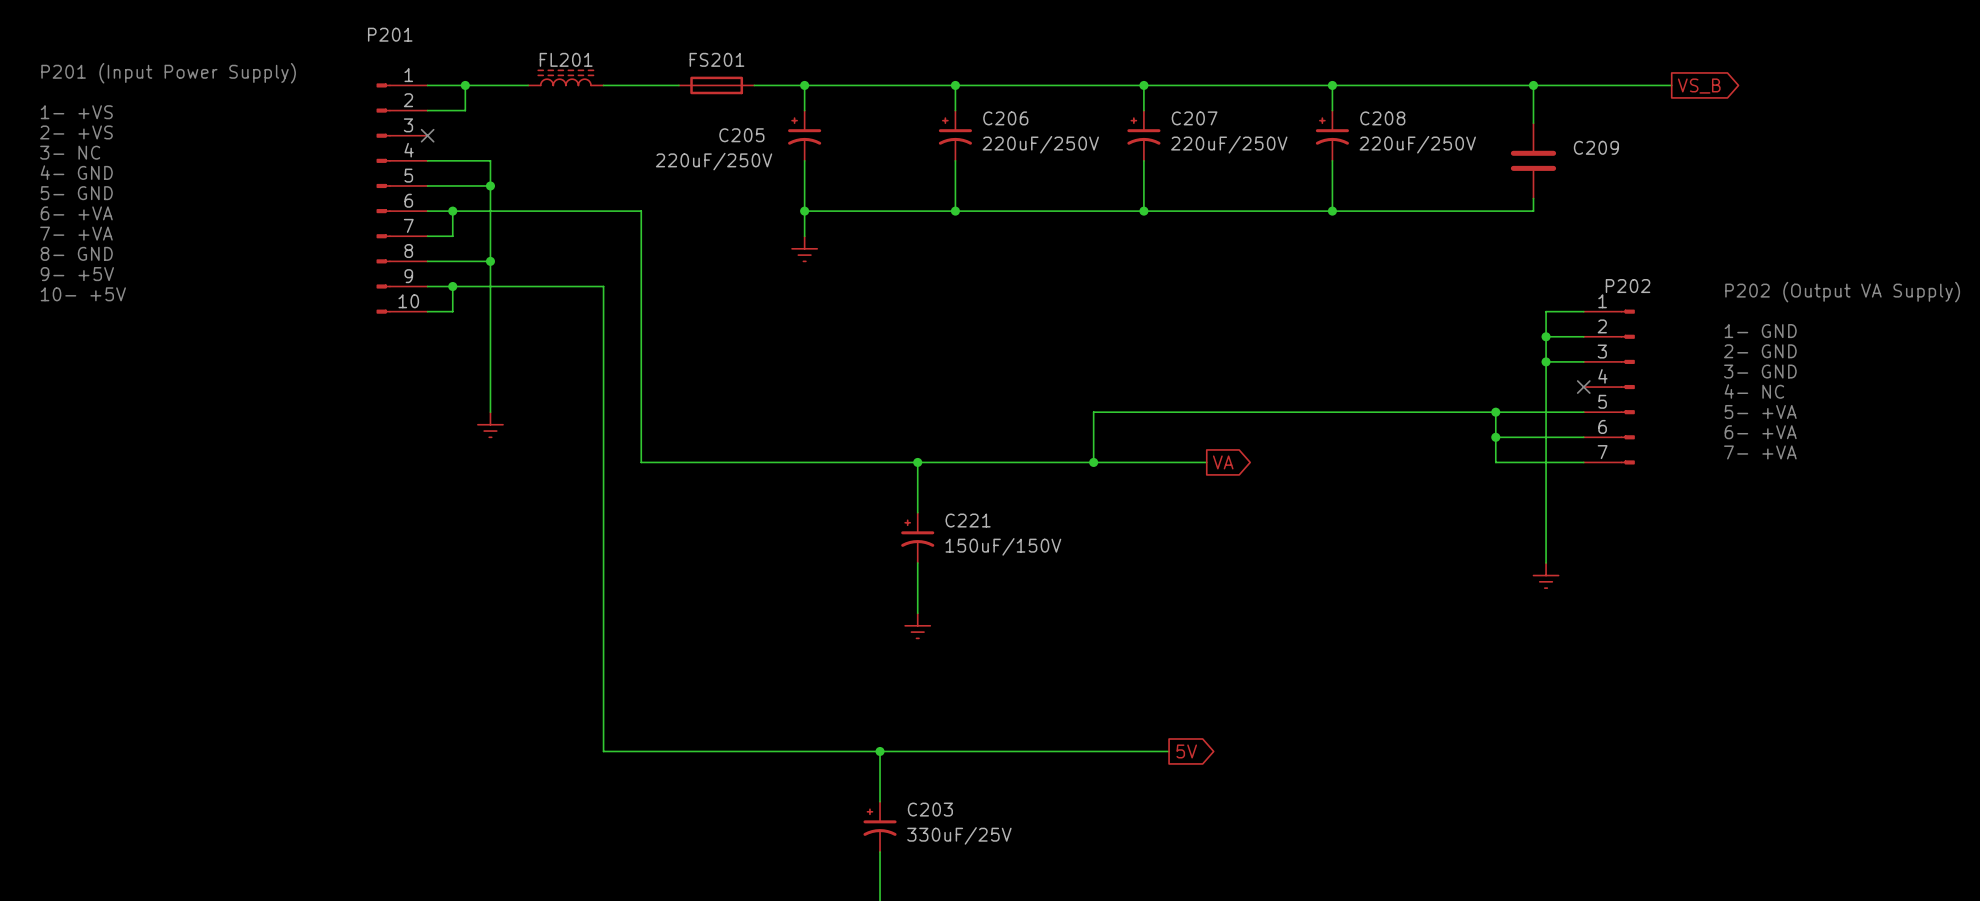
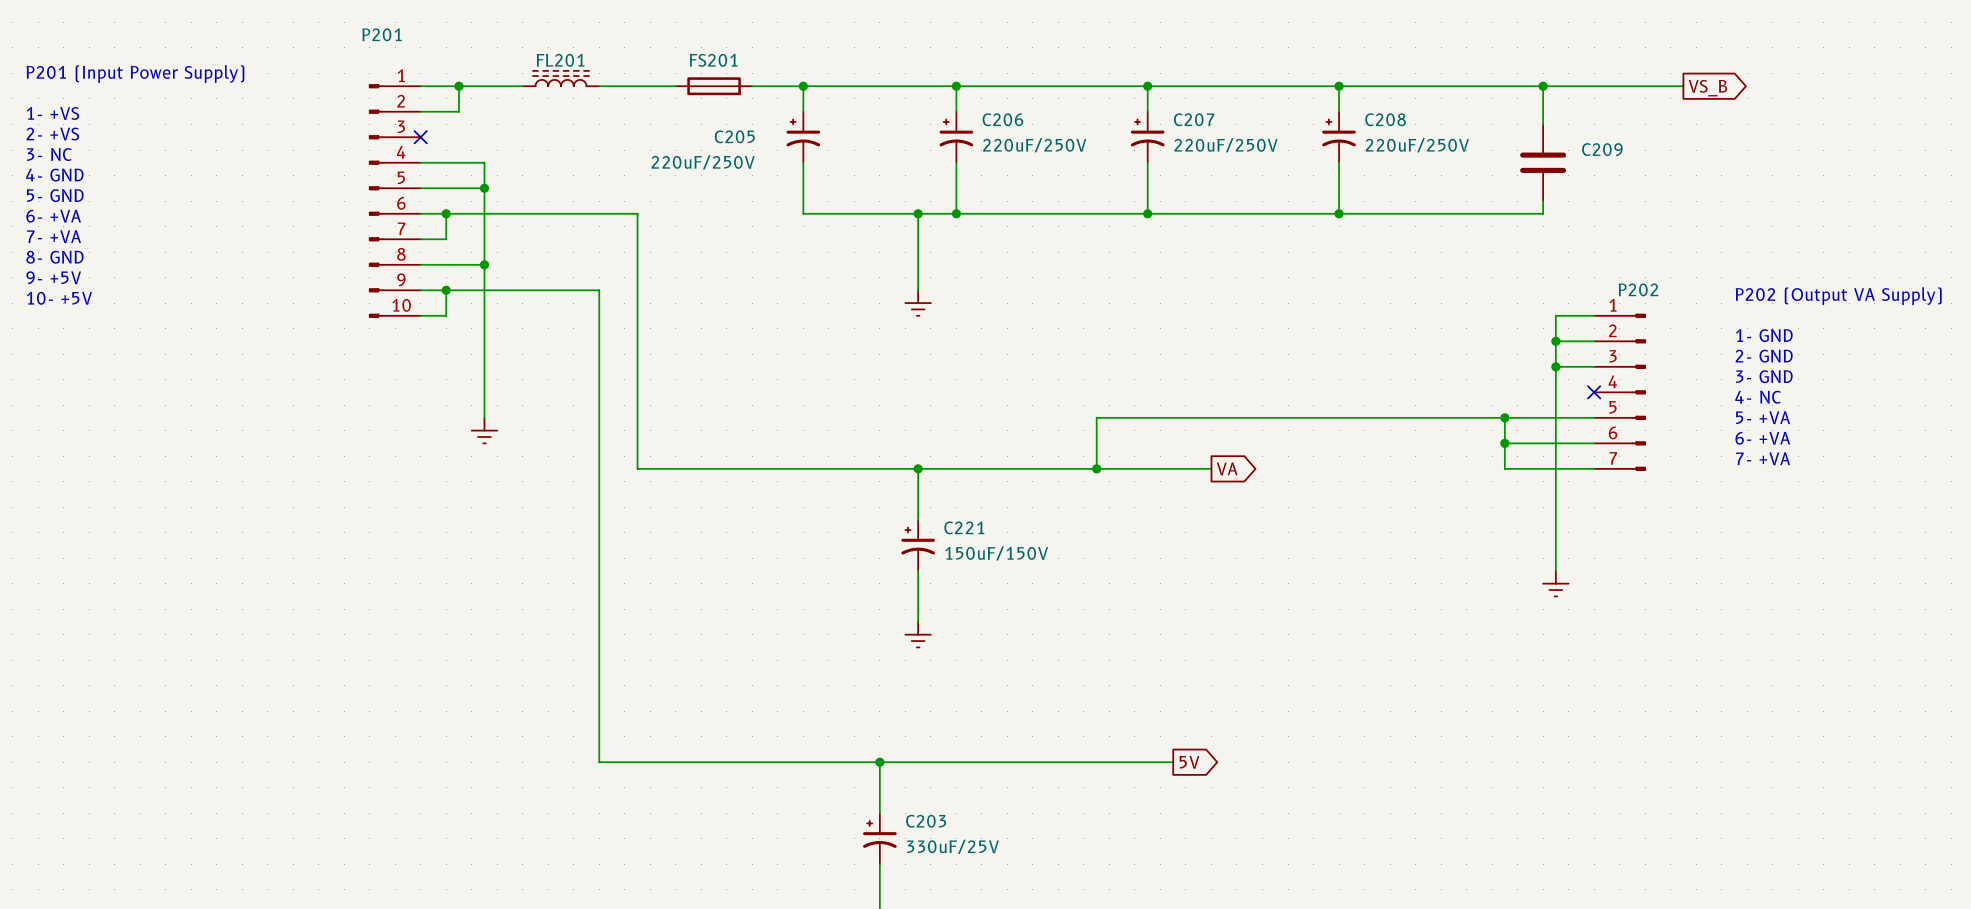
wire: (804, 211) (804, 236) -> none
junction: (804, 211) -> none
wire: none -> (918, 213) (918, 290)
junction: none -> (918, 213)
power symbol position: (804, 248) -> (918, 303)

